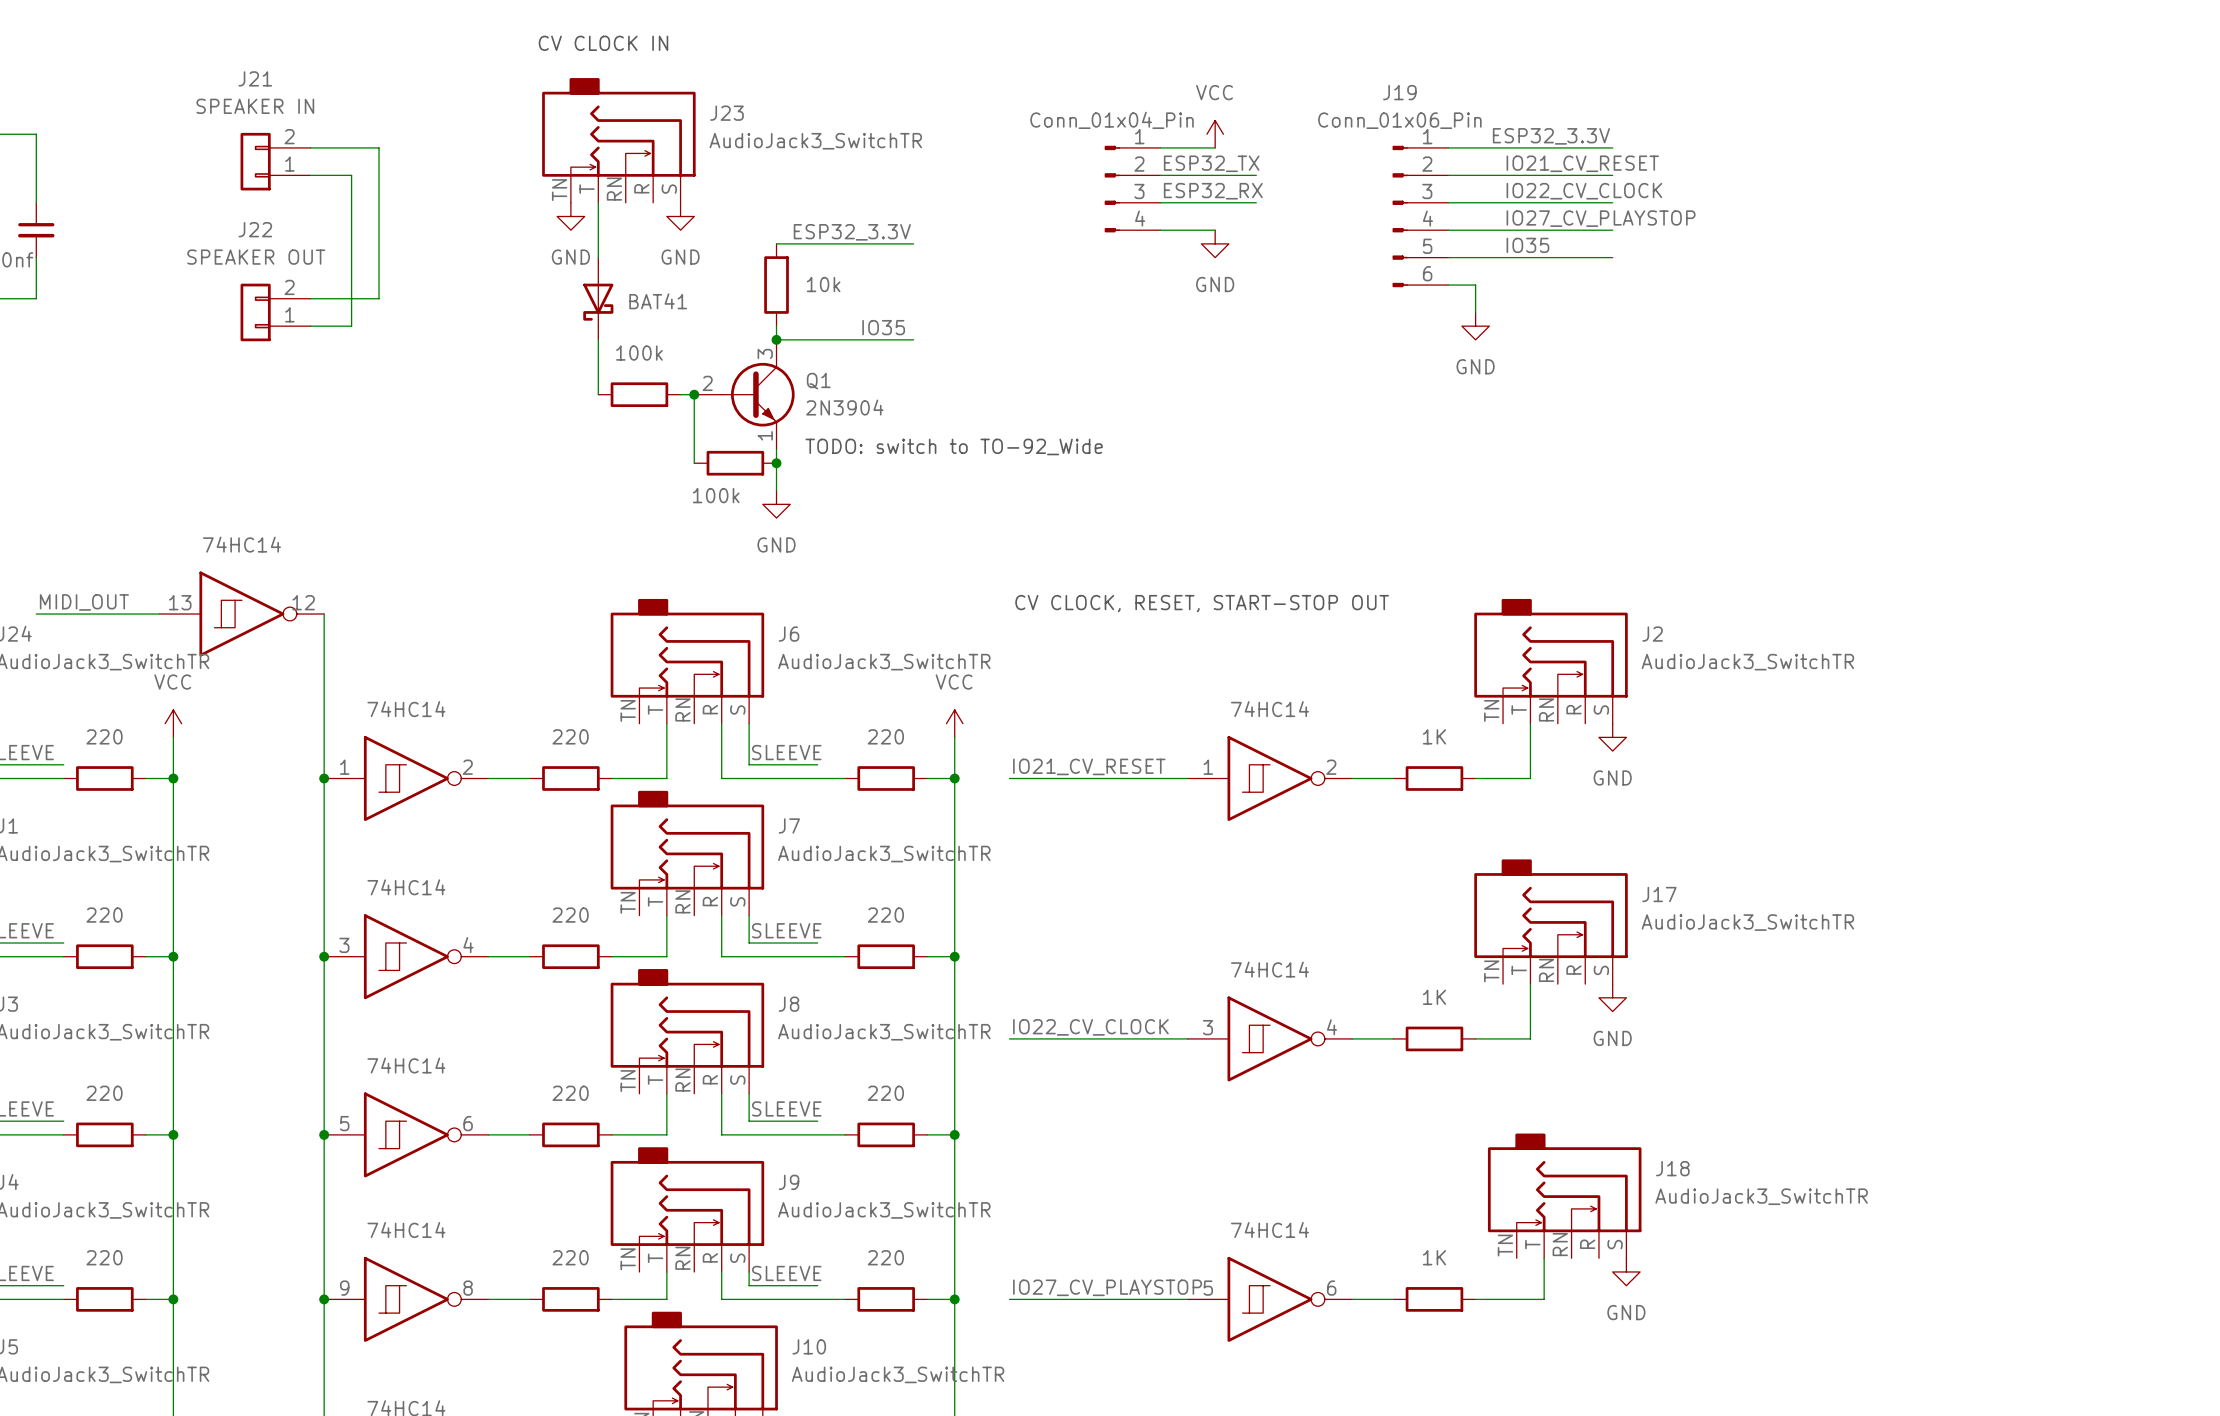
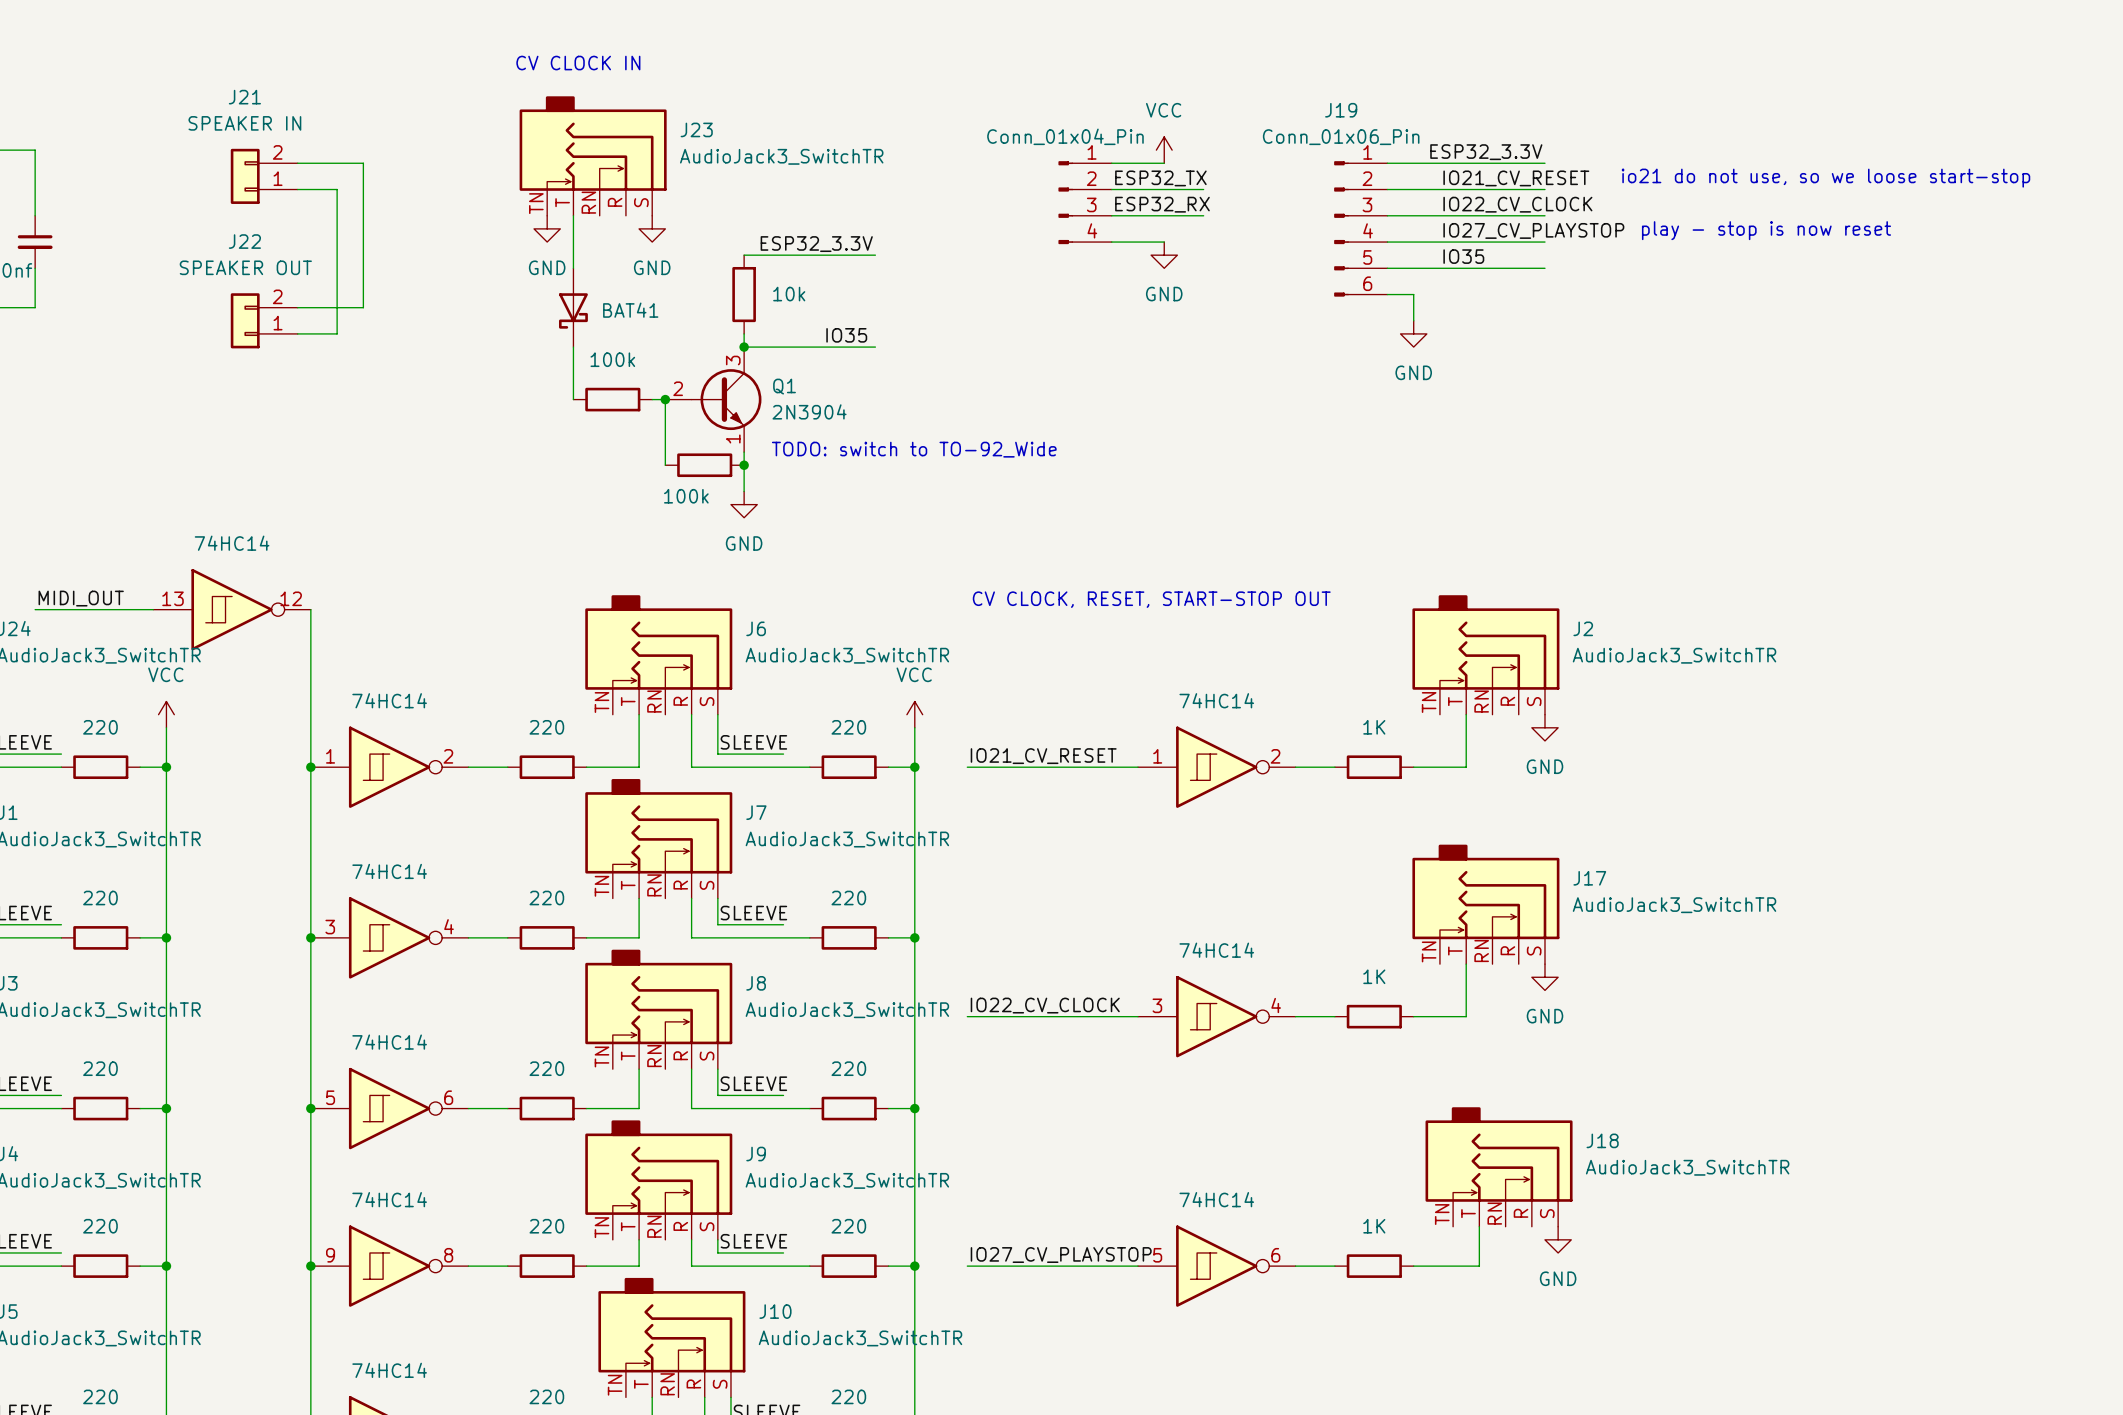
text: none -> io21 do not use, so we loose start-stop (1825, 178)
text: none -> play - stop is now reset (1766, 230)

